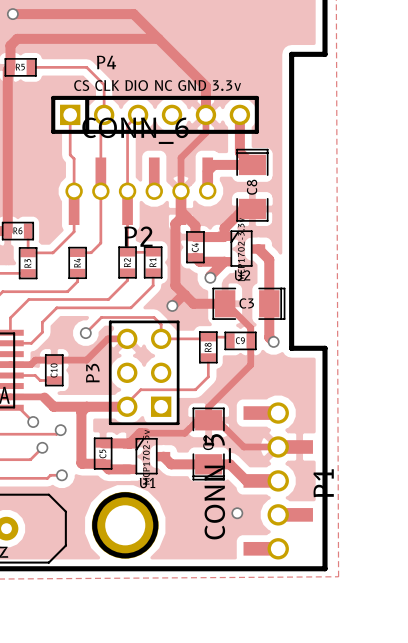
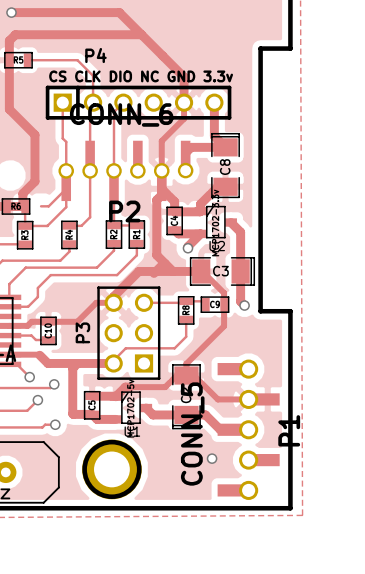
track: (10, 67) (7, 70) (7, 231) -> (9, 60) (9, 109) (34, 134) (34, 181) (22, 193) (22, 206) (6, 206)
track: none -> (66, 188) (48, 206) (41, 206)
track: none -> (173, 271) (138, 271) (113, 296) (113, 302)
via: (172, 305) -> none
track: (85, 333) (101, 317) (154, 317) (161, 324) (161, 338) -> none
via: (85, 333) -> none

